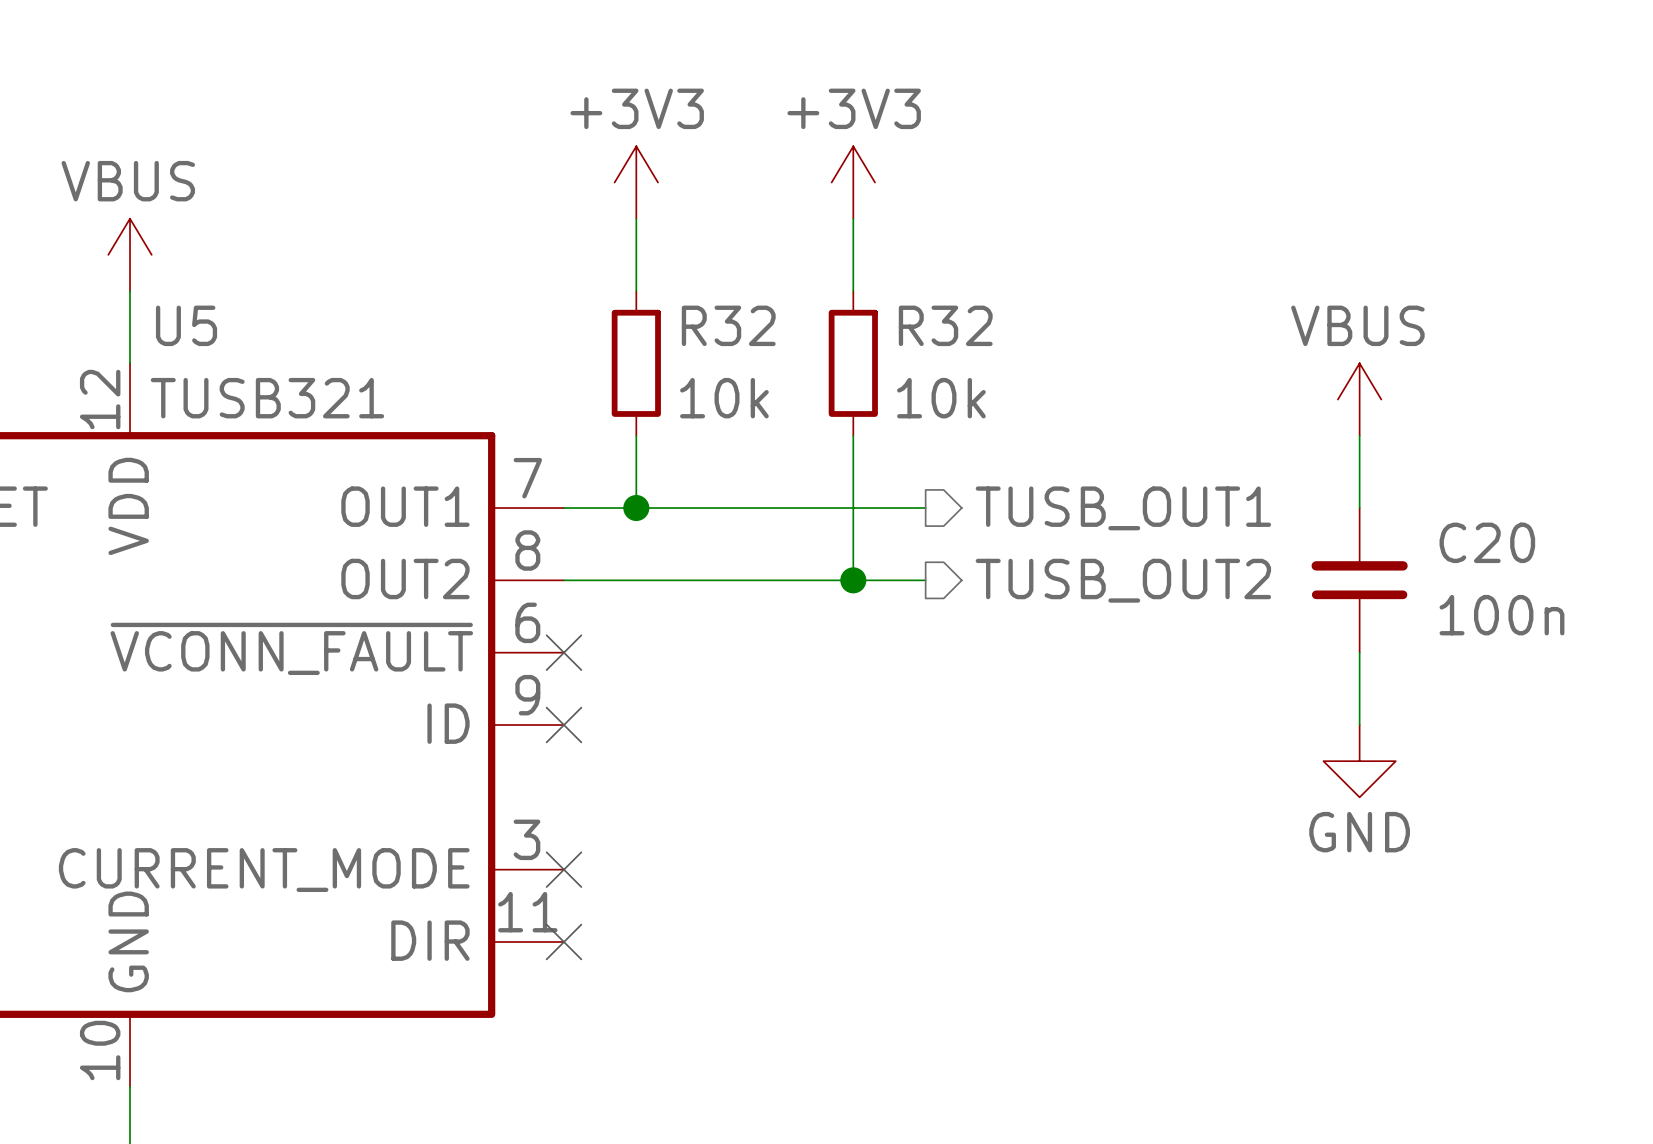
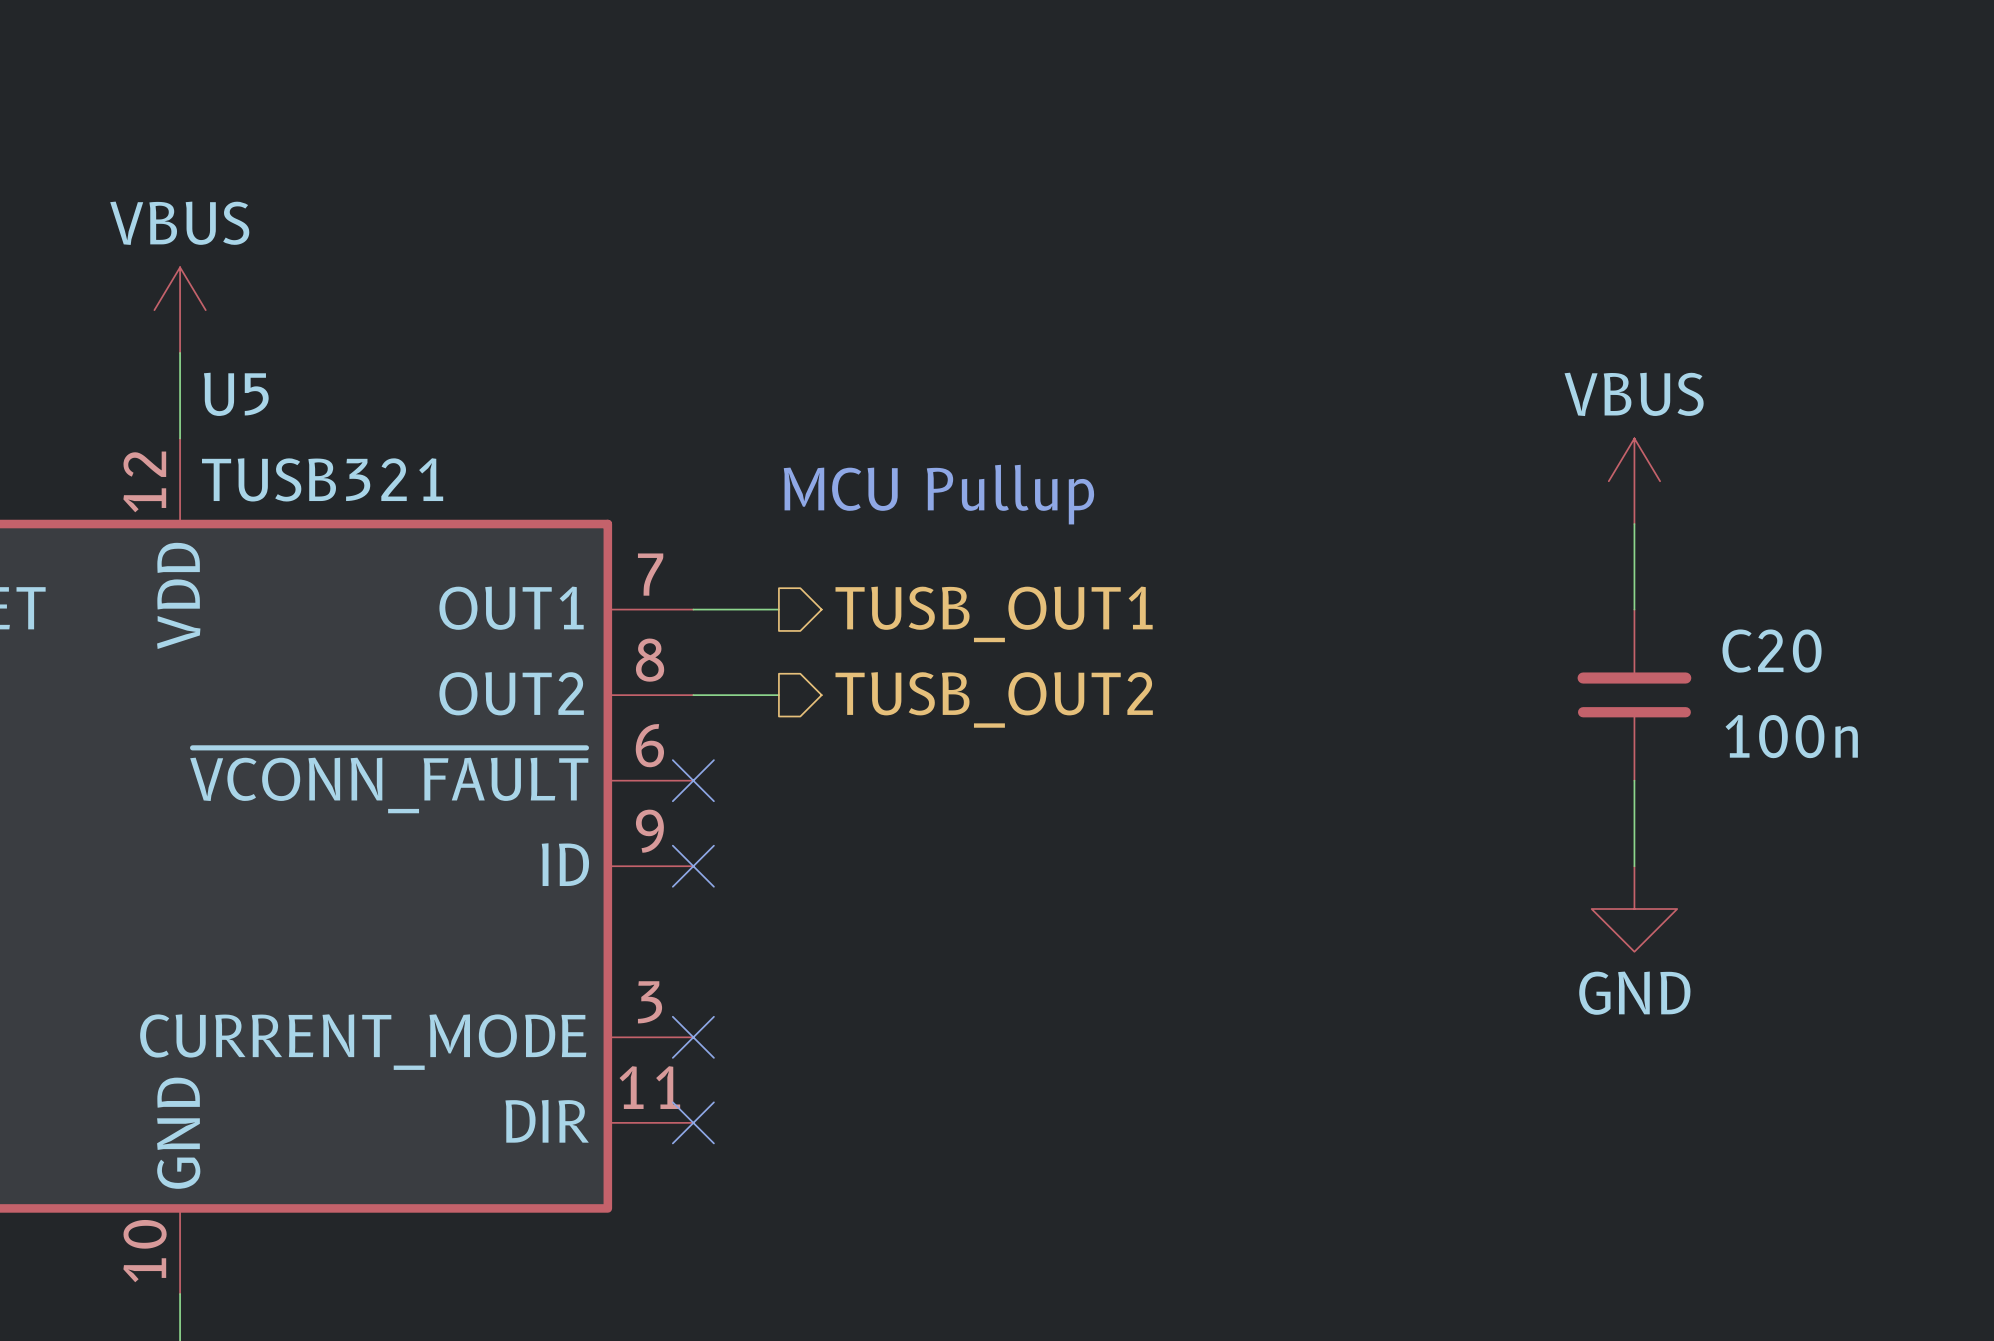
power symbol: +3V3 (636, 182) -> none
power symbol: +3V3 (853, 182) -> none
wire: (636, 218) (636, 291) -> none
wire: (853, 218) (853, 291) -> none
R32: 10k (636, 363) -> none
R32: 10k (853, 363) -> none
text: none -> MCU Pullup (938, 494)
wire: (636, 435) (636, 508) (925, 508) -> none
wire: (853, 435) (853, 580) -> none
junction: (636, 508) -> none
hierarchical label position: TUSB_OUT1 (1123, 508) -> TUSB_OUT1 (994, 614)
wire: (636, 580) (925, 580) -> none
junction: (853, 580) -> none
hierarchical label position: TUSB_OUT2 (1123, 580) -> TUSB_OUT2 (994, 699)

